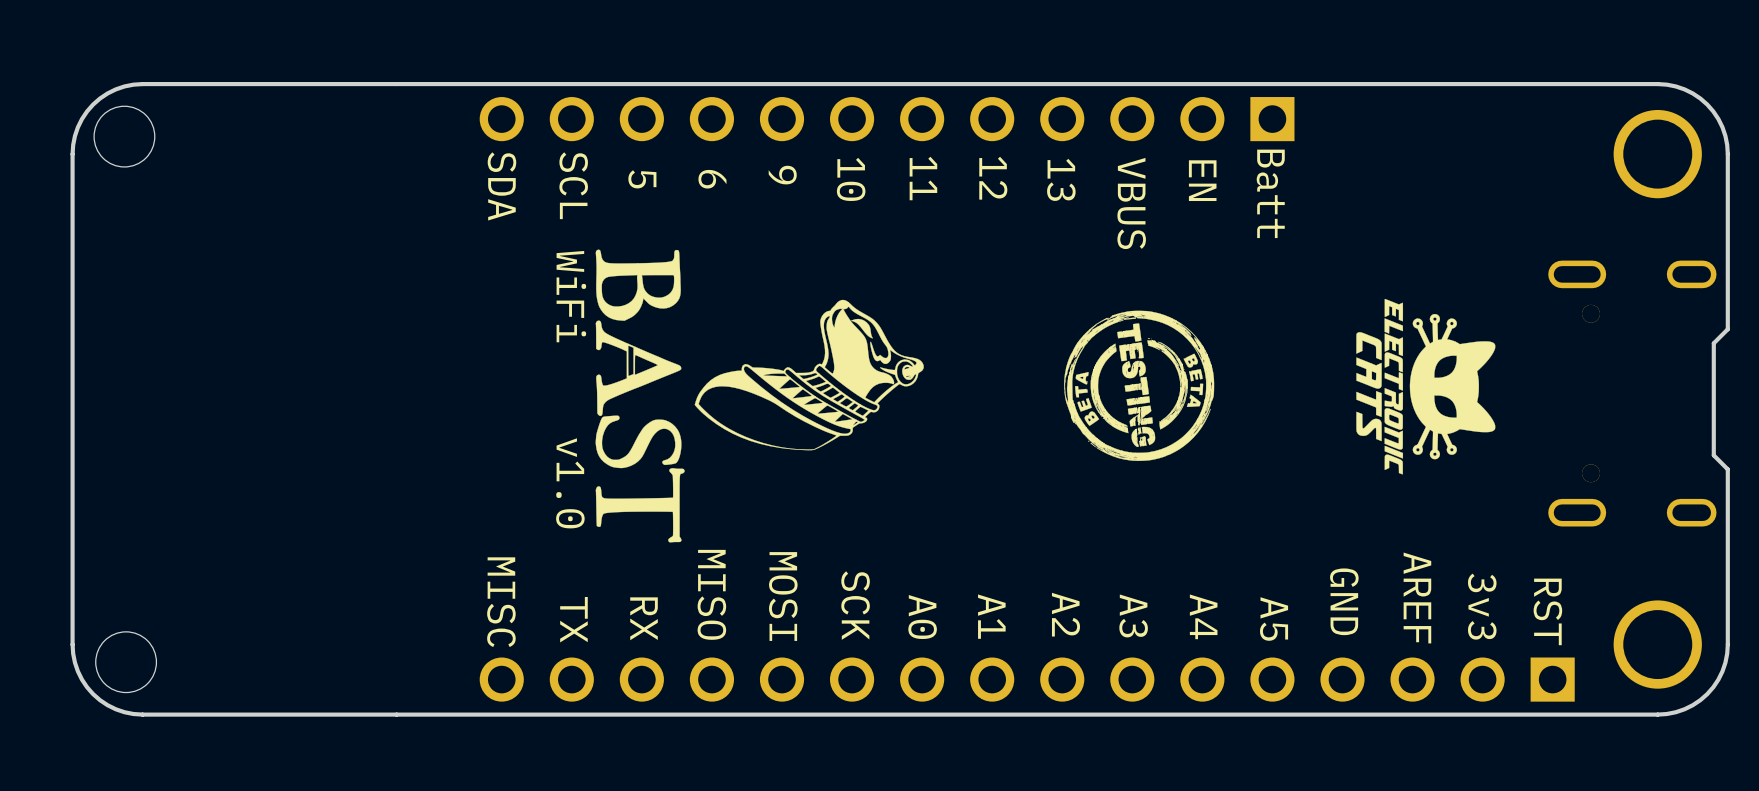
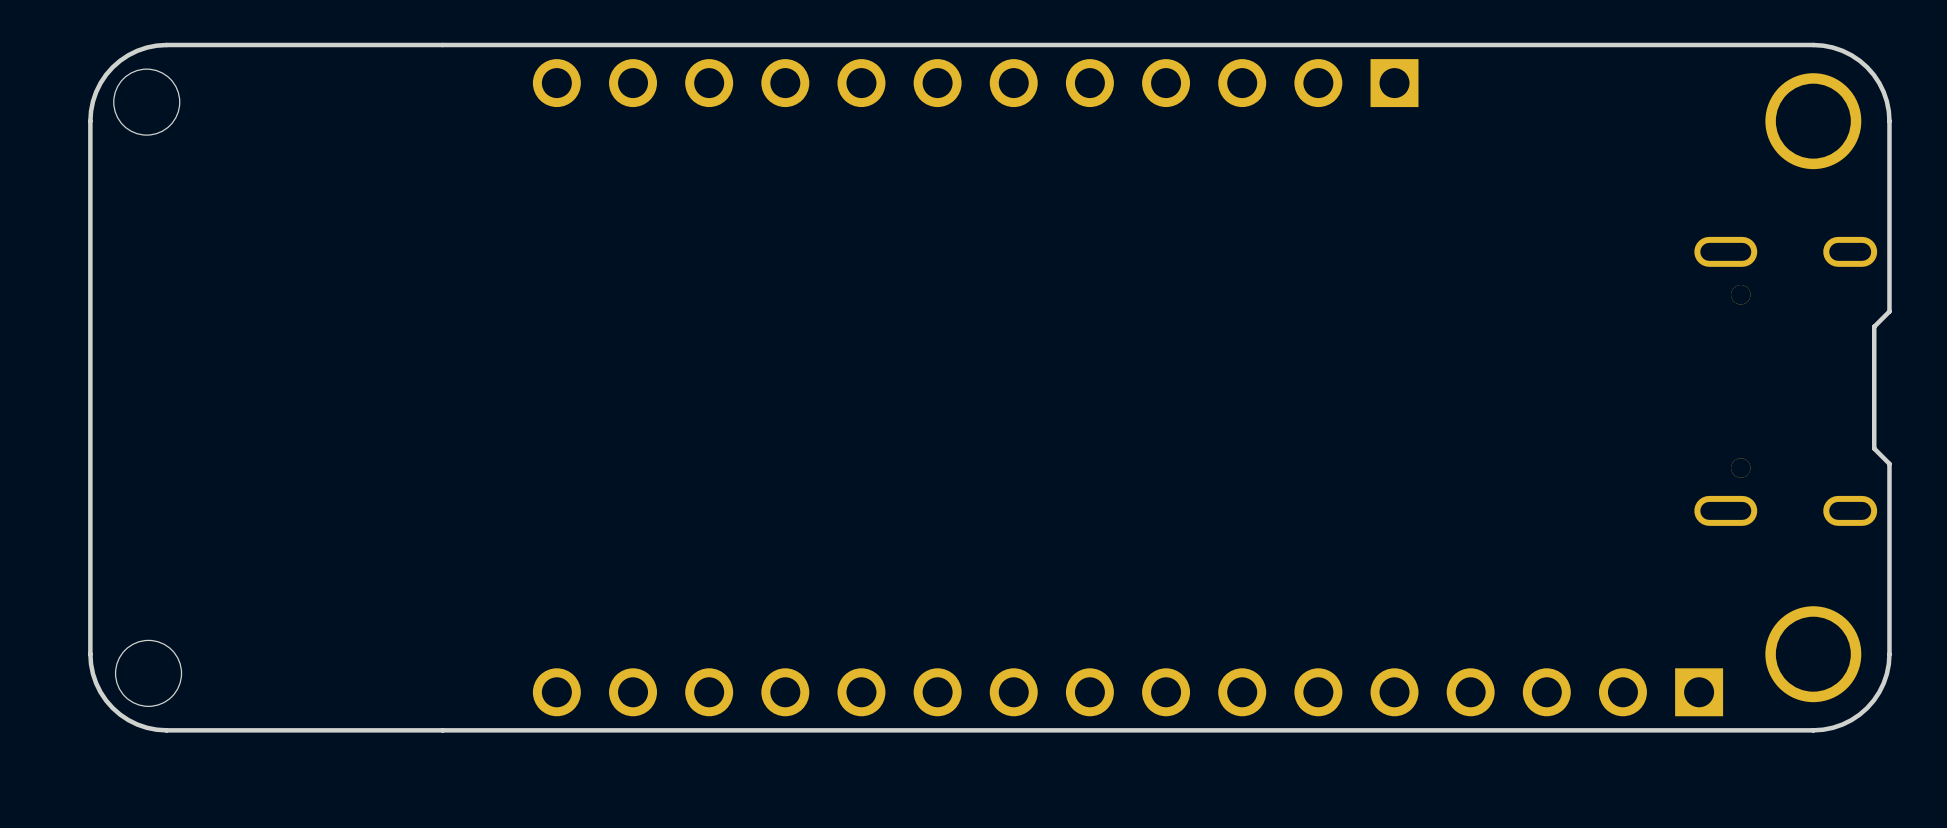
text: 9 (782, 175) -> none
text: 11 (923, 178) -> none
text: 12 (993, 178) -> none
text: 5 (642, 179) -> none
text: 6 (712, 179) -> none
text: 10 (851, 179) -> none
text: 13 (1061, 179) -> none
text: EN (1202, 180) -> none
text: SCL (573, 185) -> none
text: SDA (501, 186) -> none
text: Batt (1270, 193) -> none
text: VBUS (1131, 203) -> none
drawing: [595, 249, 924, 543] -> none
text: WiFi (571, 296) -> none
drawing: [1356, 298, 1496, 475] -> none
drawing: [1063, 310, 1215, 461] -> none
text: v1.0 (570, 483) -> none
text: MISO (711, 594) -> none
text: MOSI (783, 596) -> none
text: AREF (1417, 597) -> none
text: GND (1344, 601) -> none
text: MISC (501, 602) -> none
text: SCK (855, 605) -> none
text: 3v3 (1482, 606) -> none
text: RST (1547, 611) -> none
text: A2 (1065, 614) -> none
text: A3 (1133, 615) -> none
text: A1 (991, 616) -> none
text: A4 (1203, 616) -> none
text: A0 (922, 617) -> none
text: RX (644, 618) -> none
text: TX (573, 619) -> none
text: A5 (1274, 619) -> none

